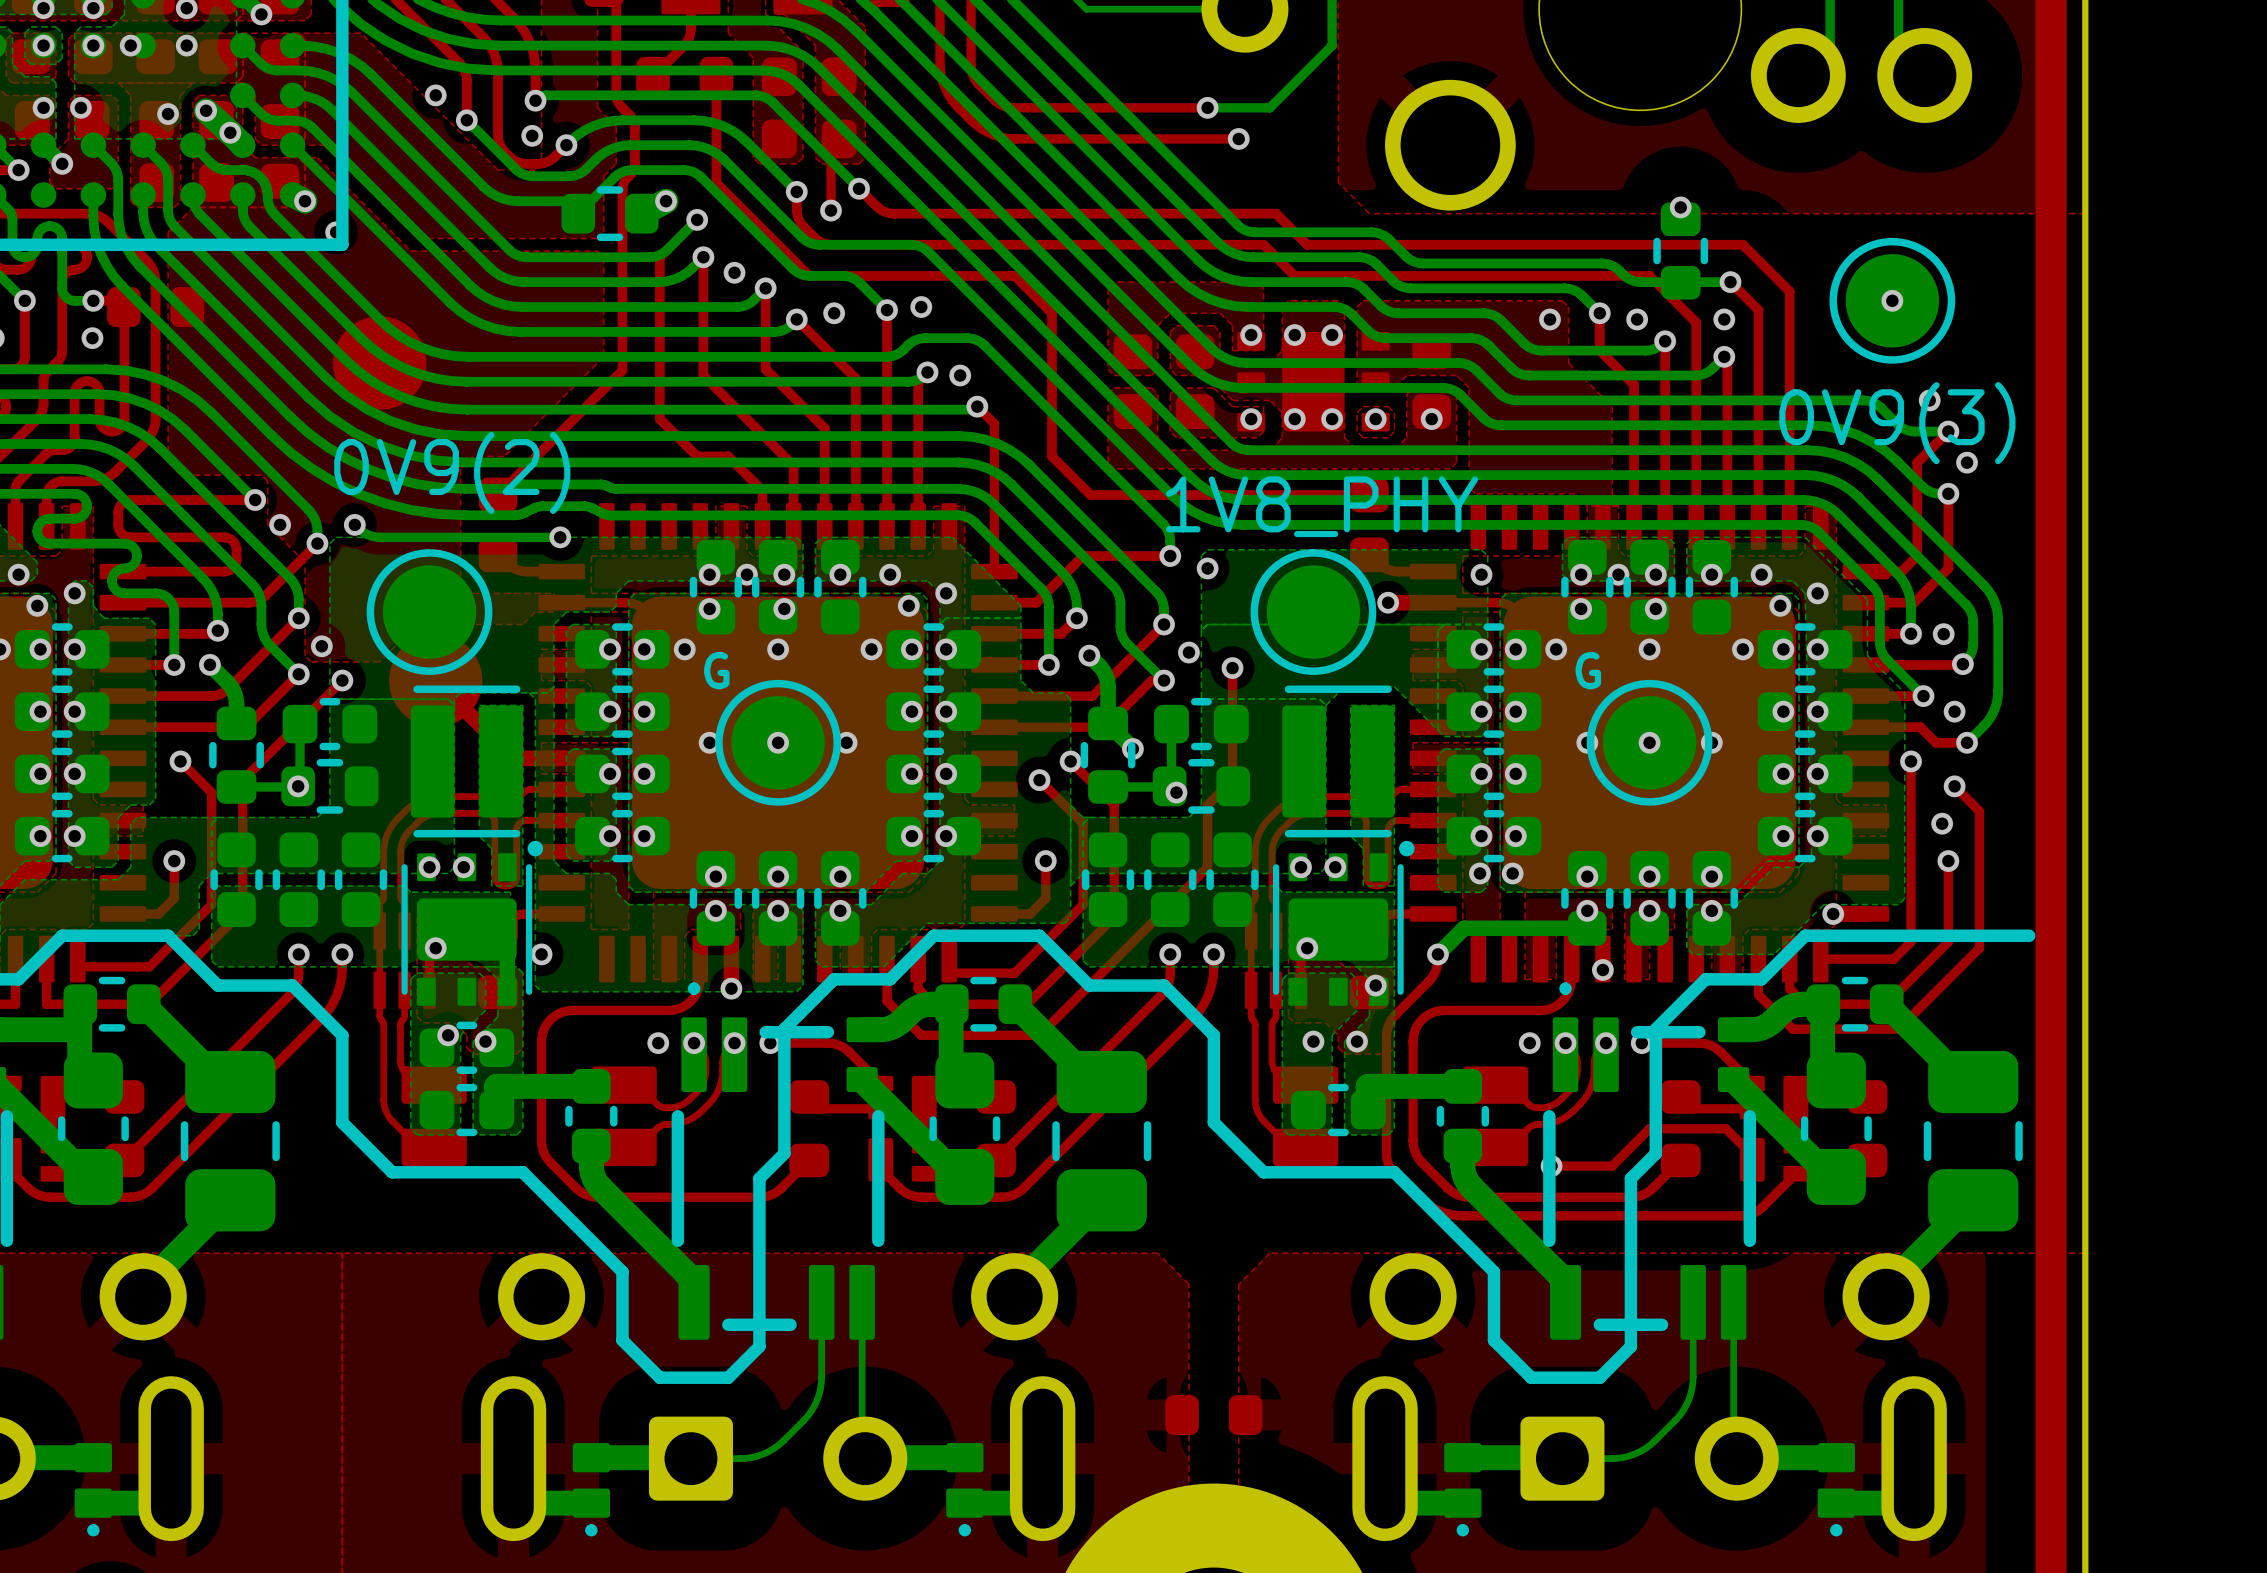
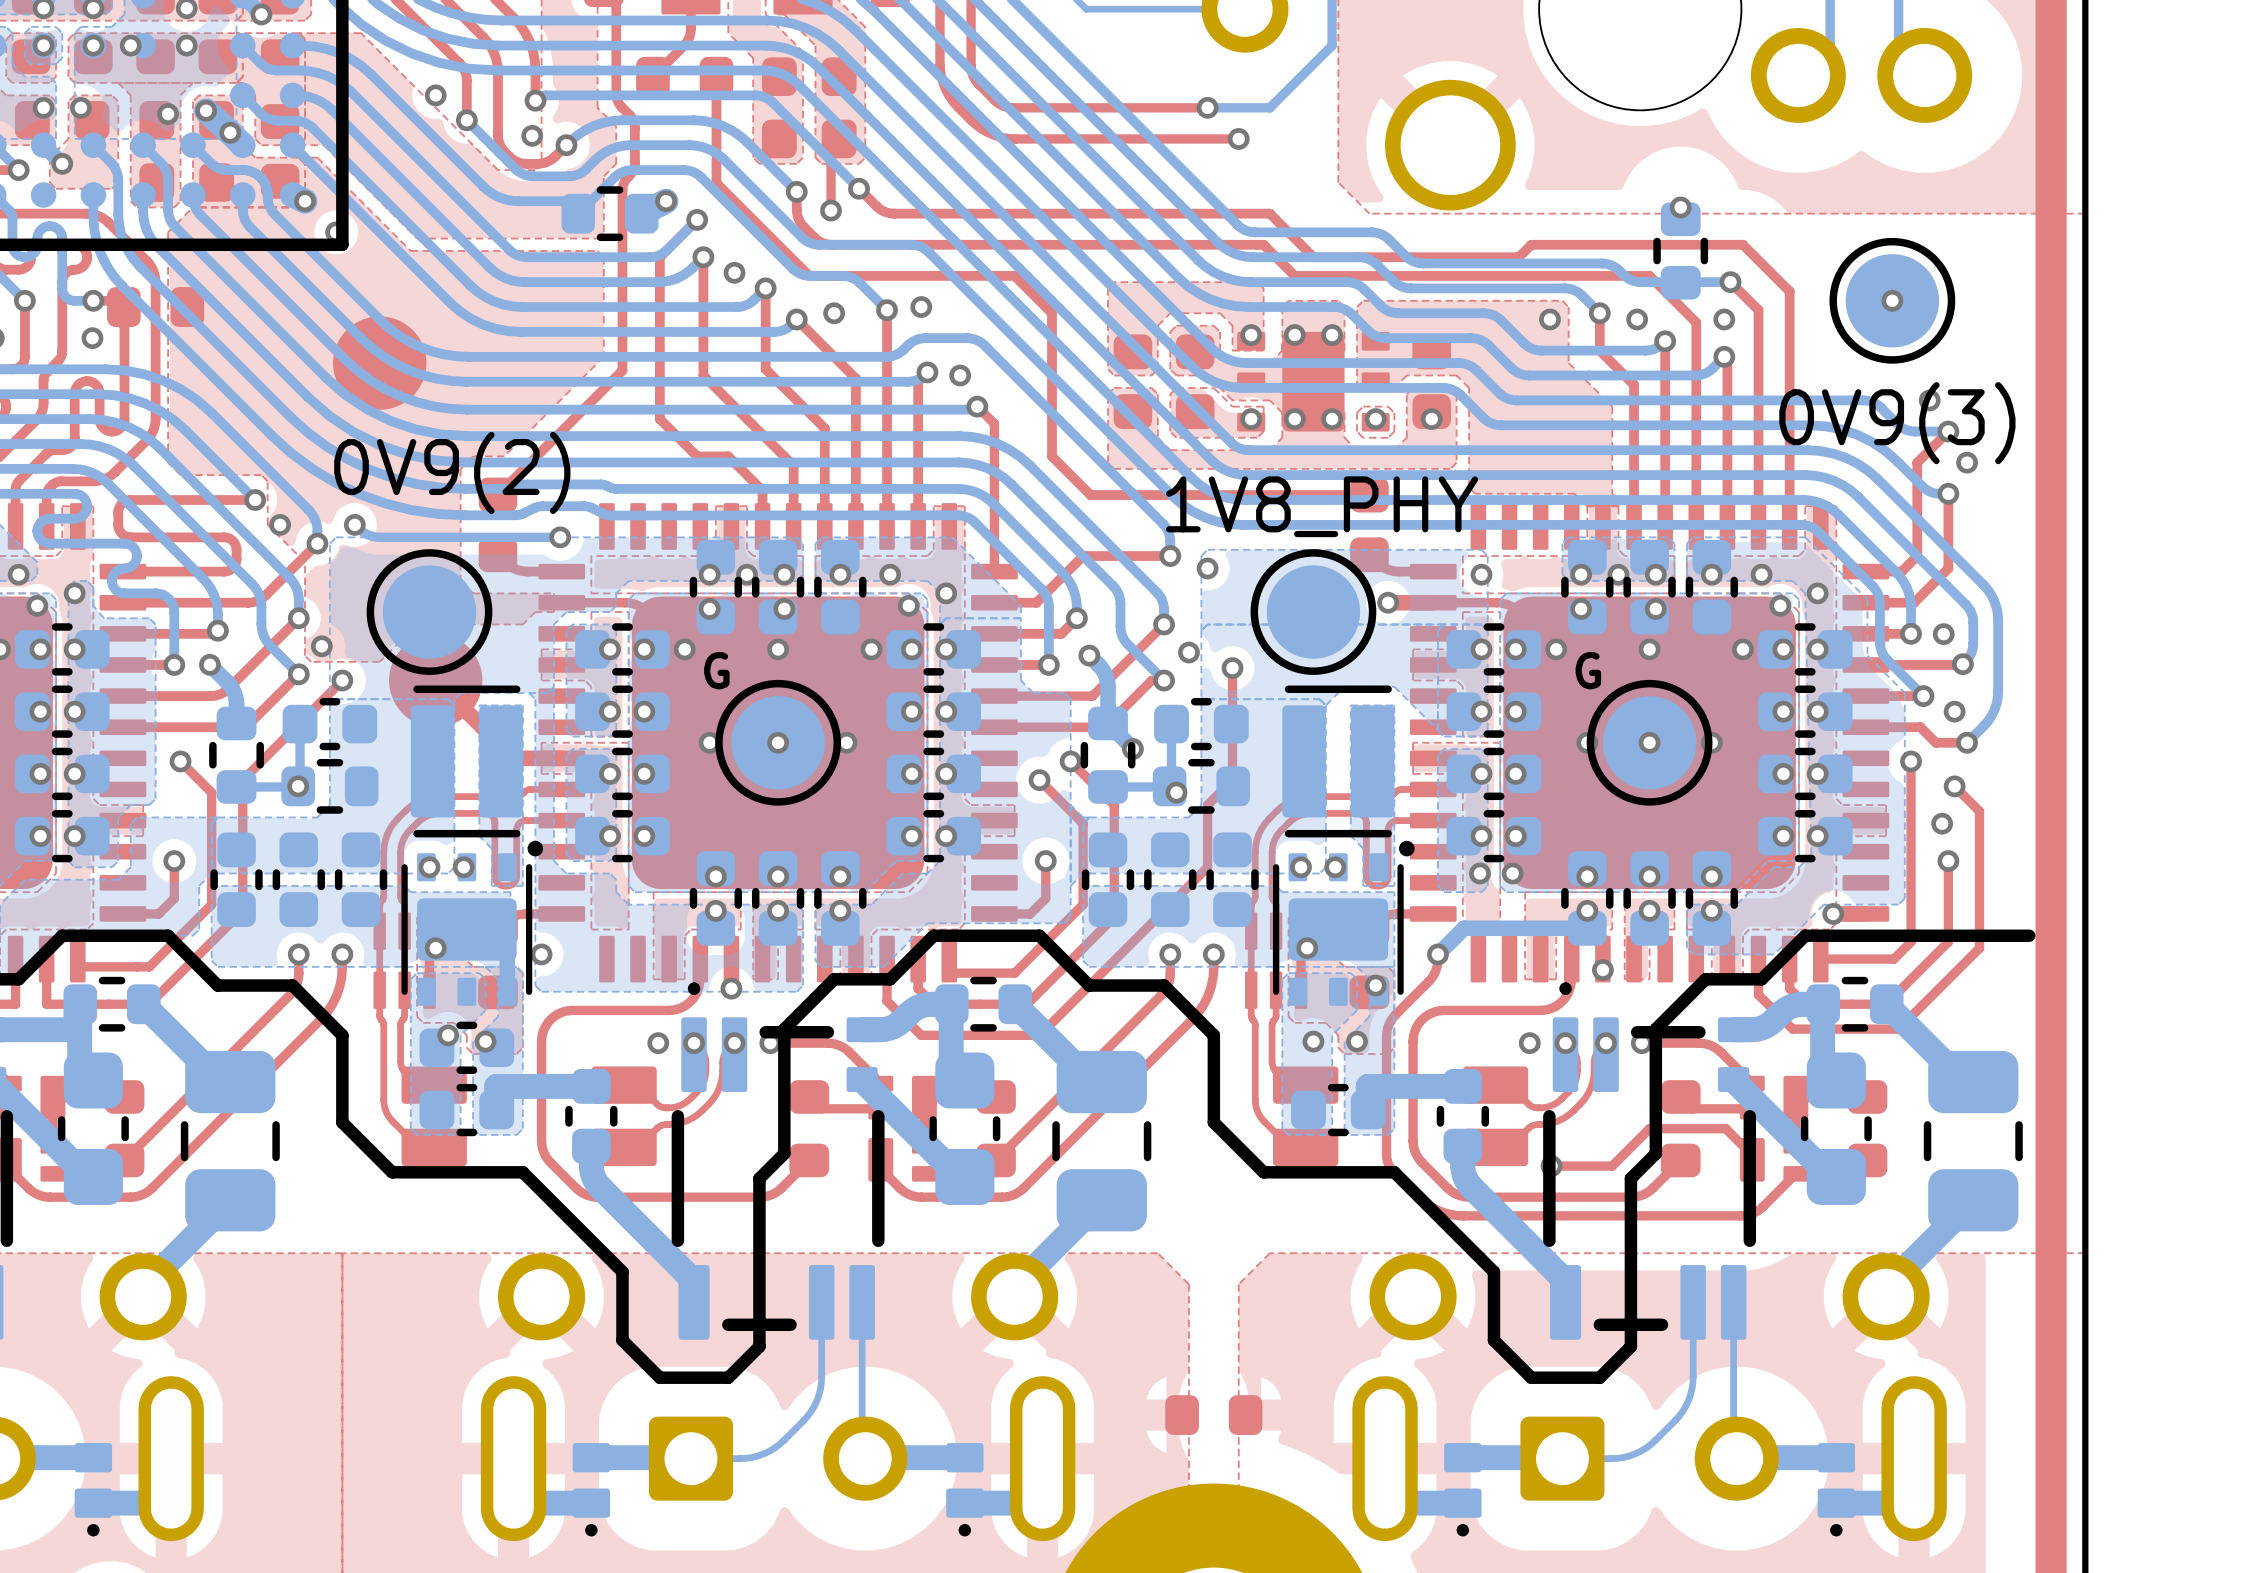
top track: (1269, 213) (1276, 213) (1307, 244) (1531, 244) -> (1269, 213) (1313, 257) (1518, 257) (1531, 244)

